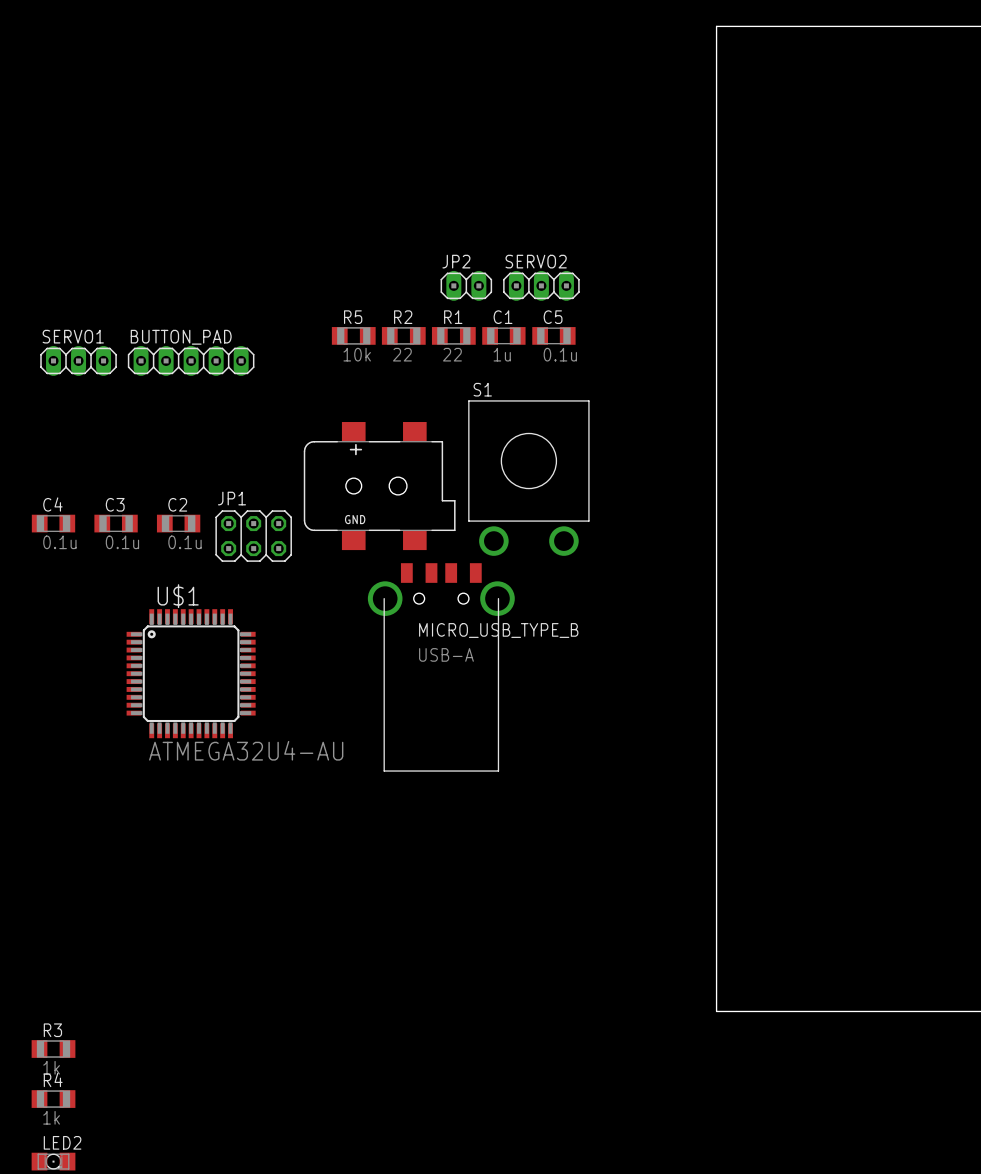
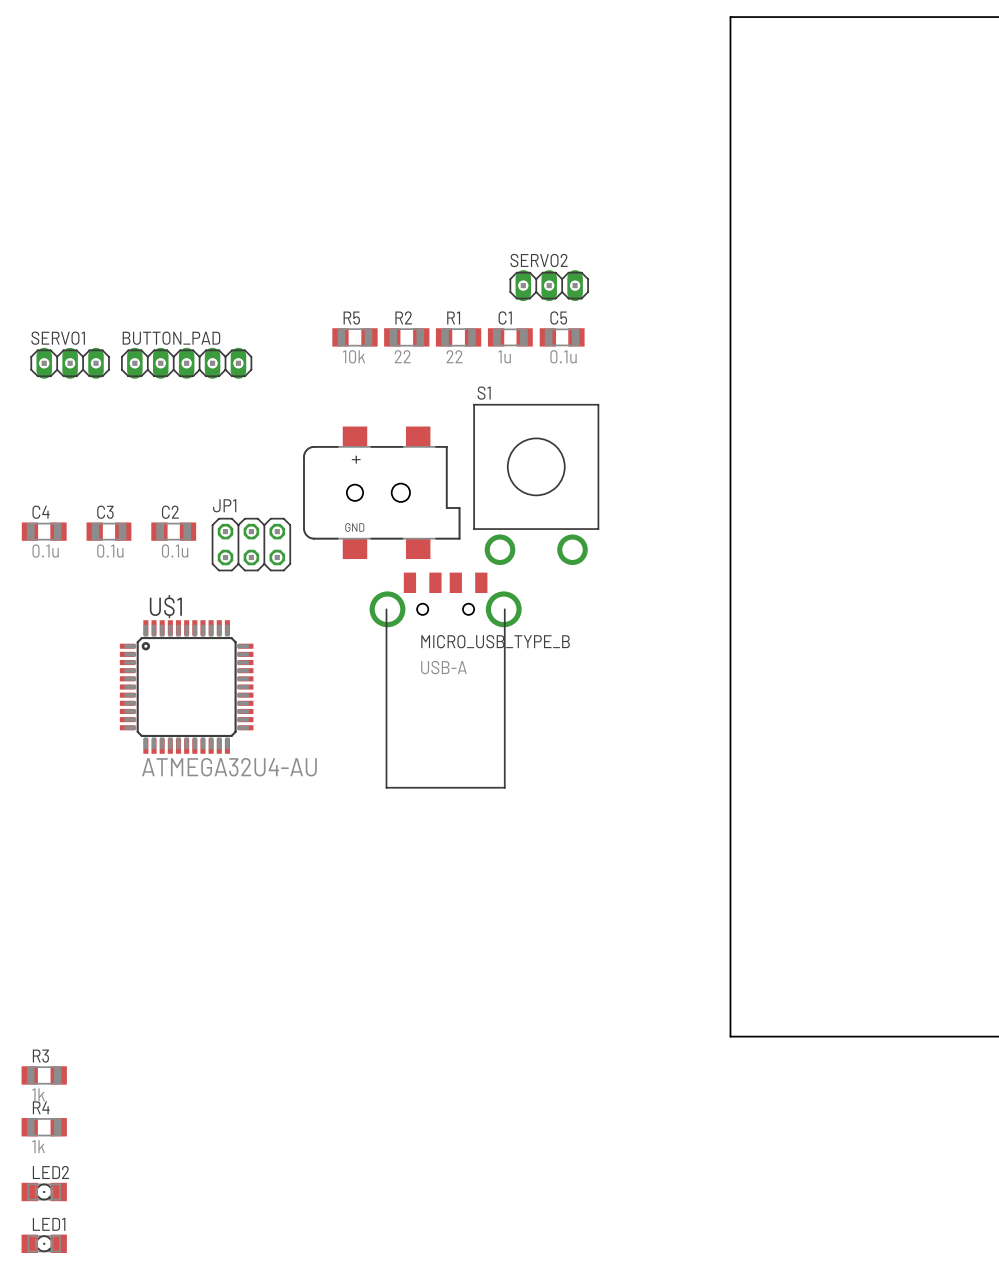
JP2: (466, 285) -> none

